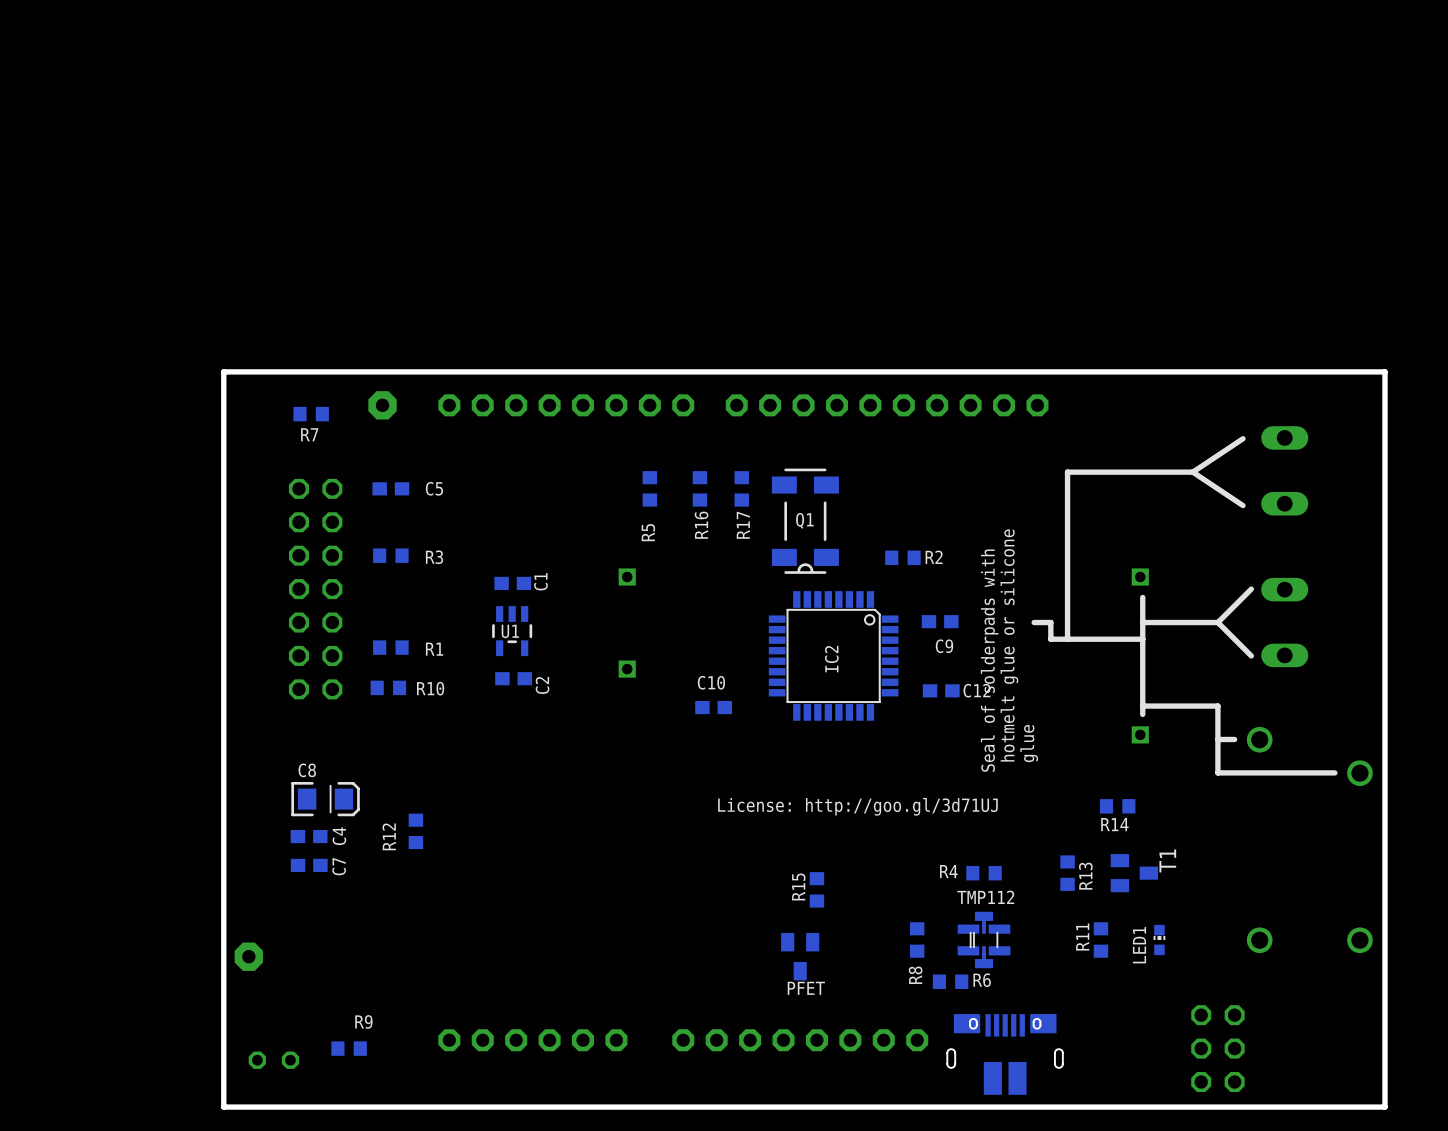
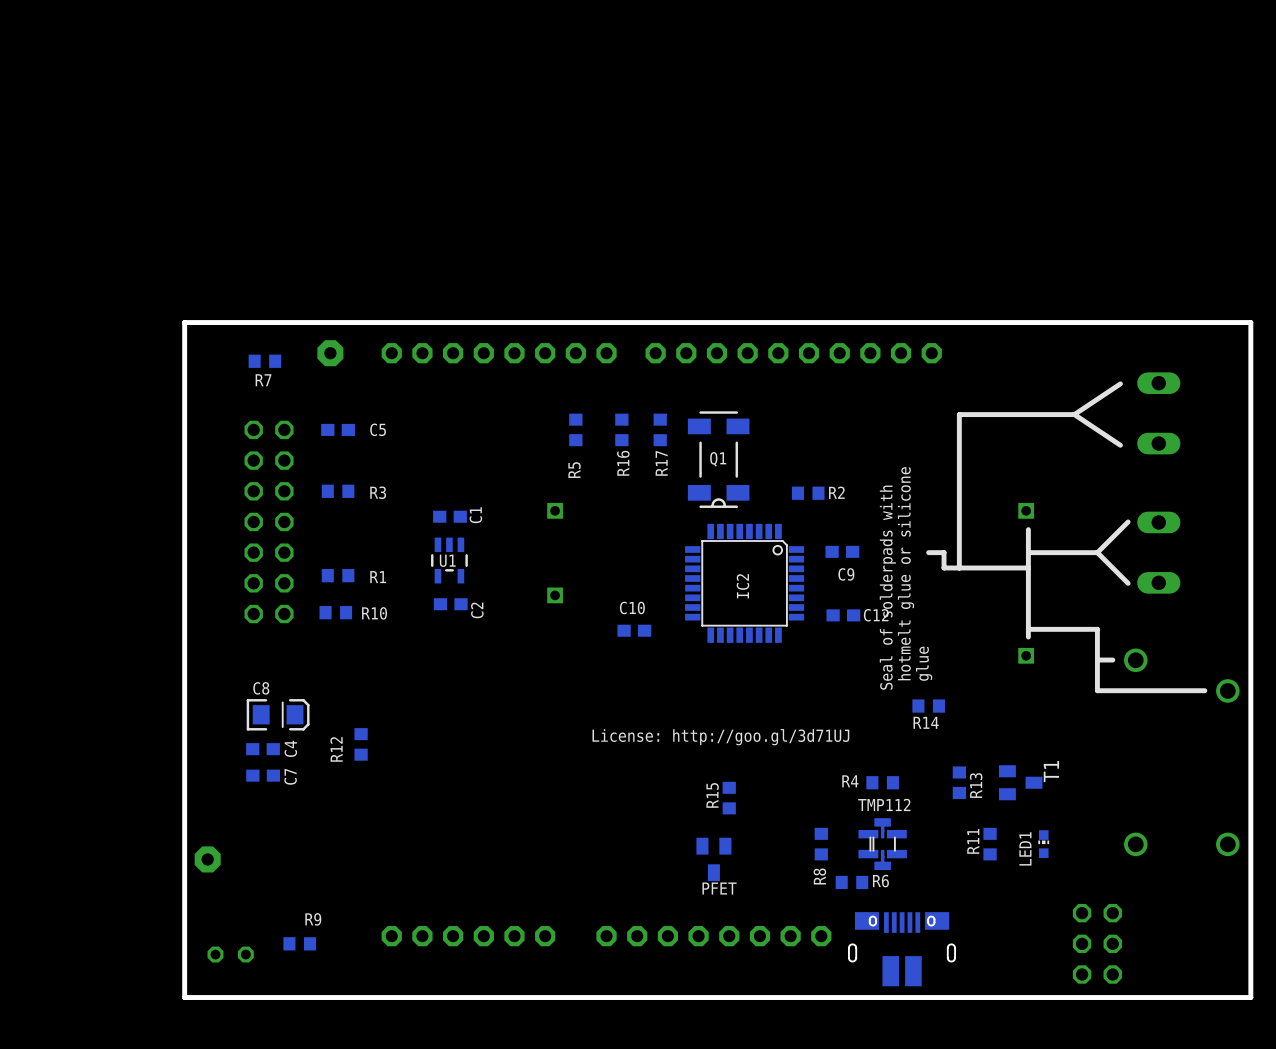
text position: License: http://goo.gl/3d71UJ (857, 806) -> License: http://goo.gl/3d71UJ (720, 737)
R14 position: (1117, 806) -> (928, 706)

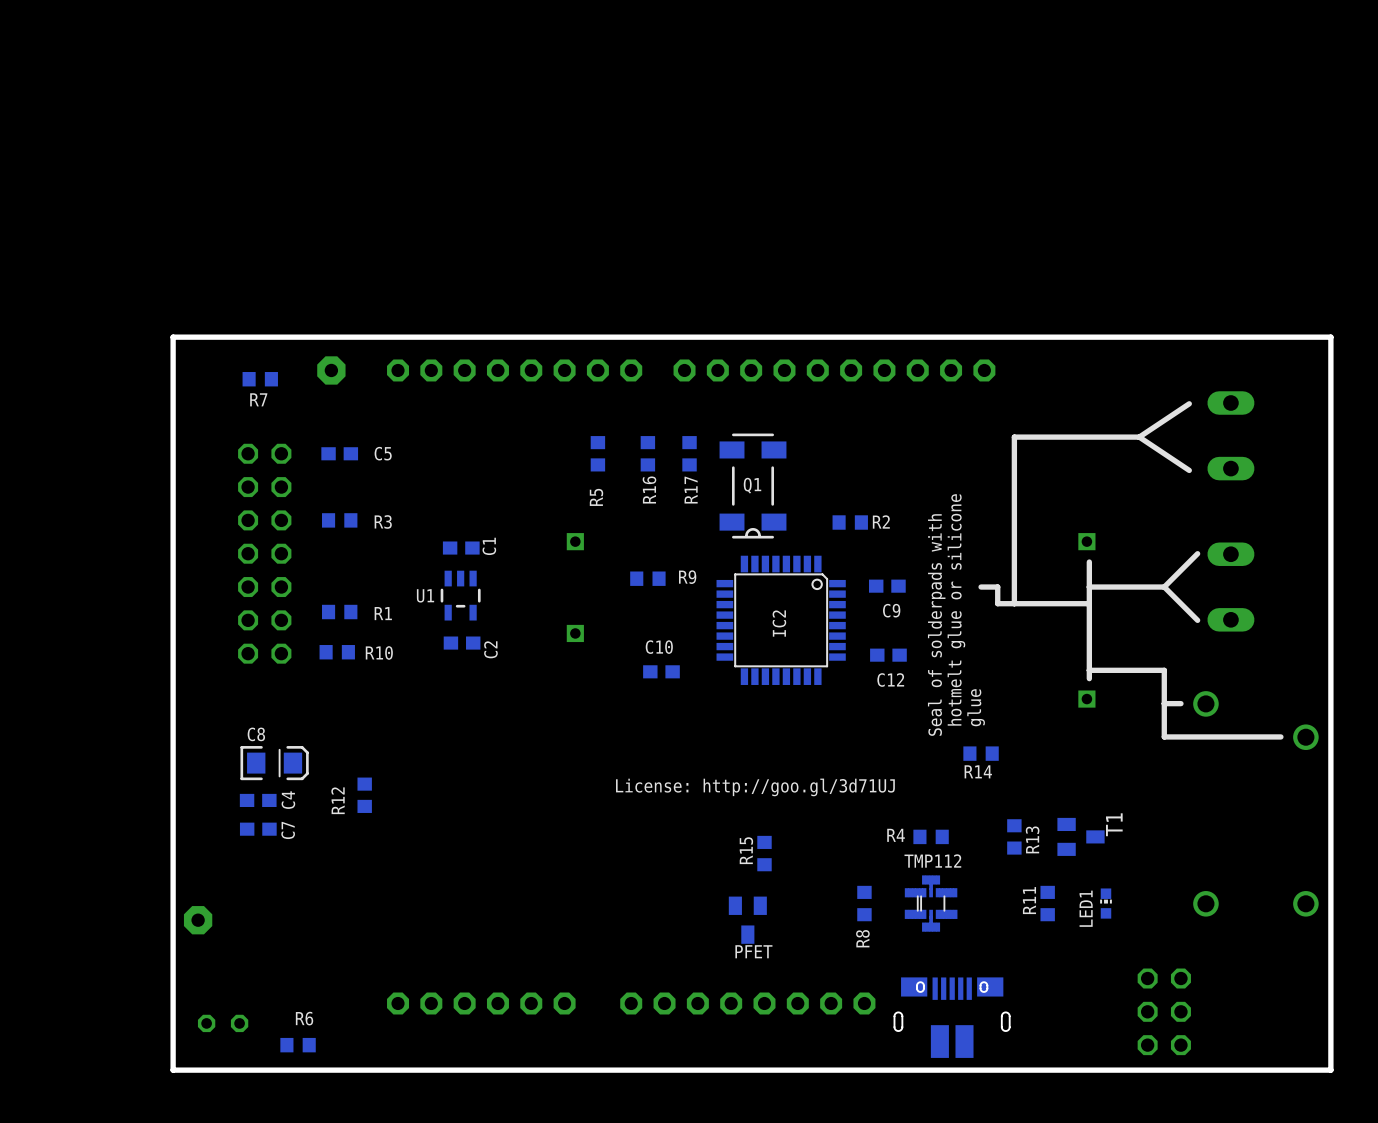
U1 name position: U1 (447, 560) -> U1 (425, 595)
C12 name position: C12 (876, 615) -> C12 (890, 680)
R6 name position: R6 (880, 881) -> R6 (304, 1018)
R6 position: (851, 882) -> (298, 1045)
R9 name position: R9 (313, 919) -> R9 (687, 577)
R9 position: (299, 943) -> (647, 578)

